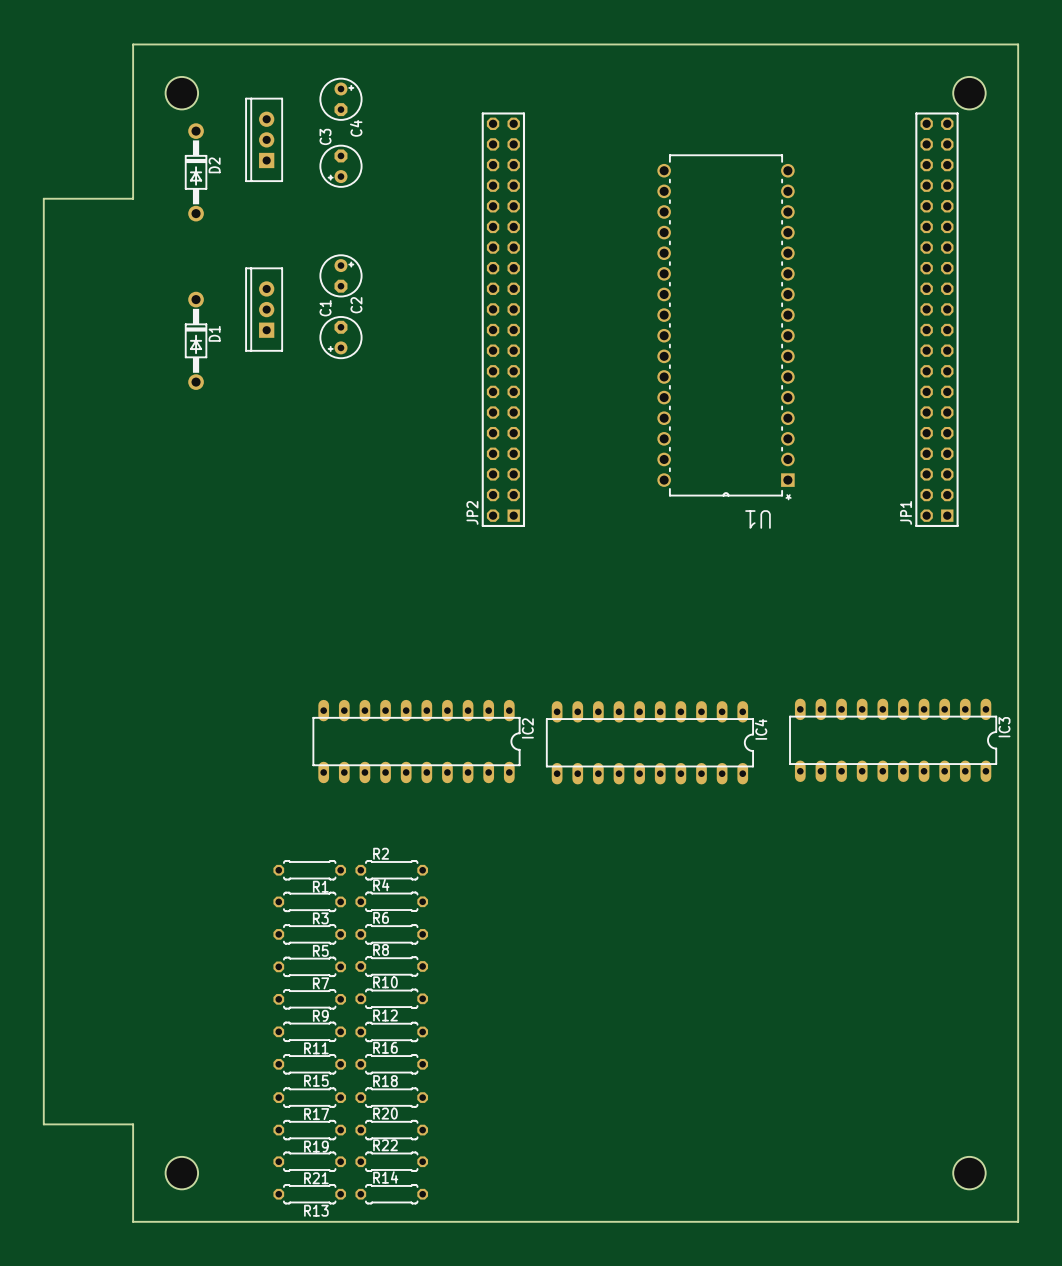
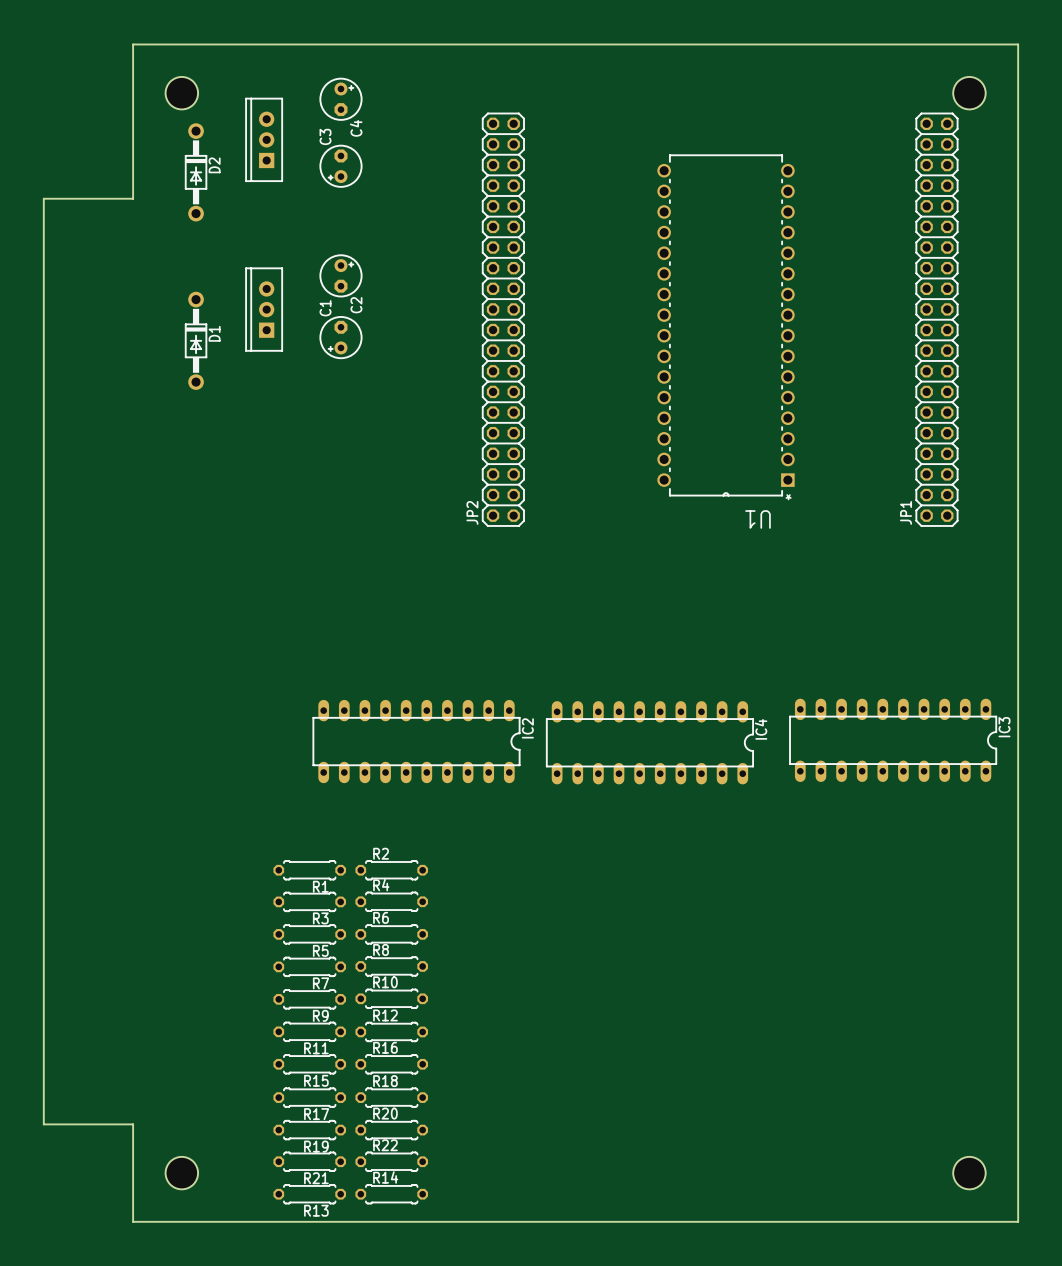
JP2 footprint: [481, 112, 526, 528] -> [482, 112, 525, 527]
JP1 footprint: [915, 112, 959, 528] -> [915, 112, 959, 527]

